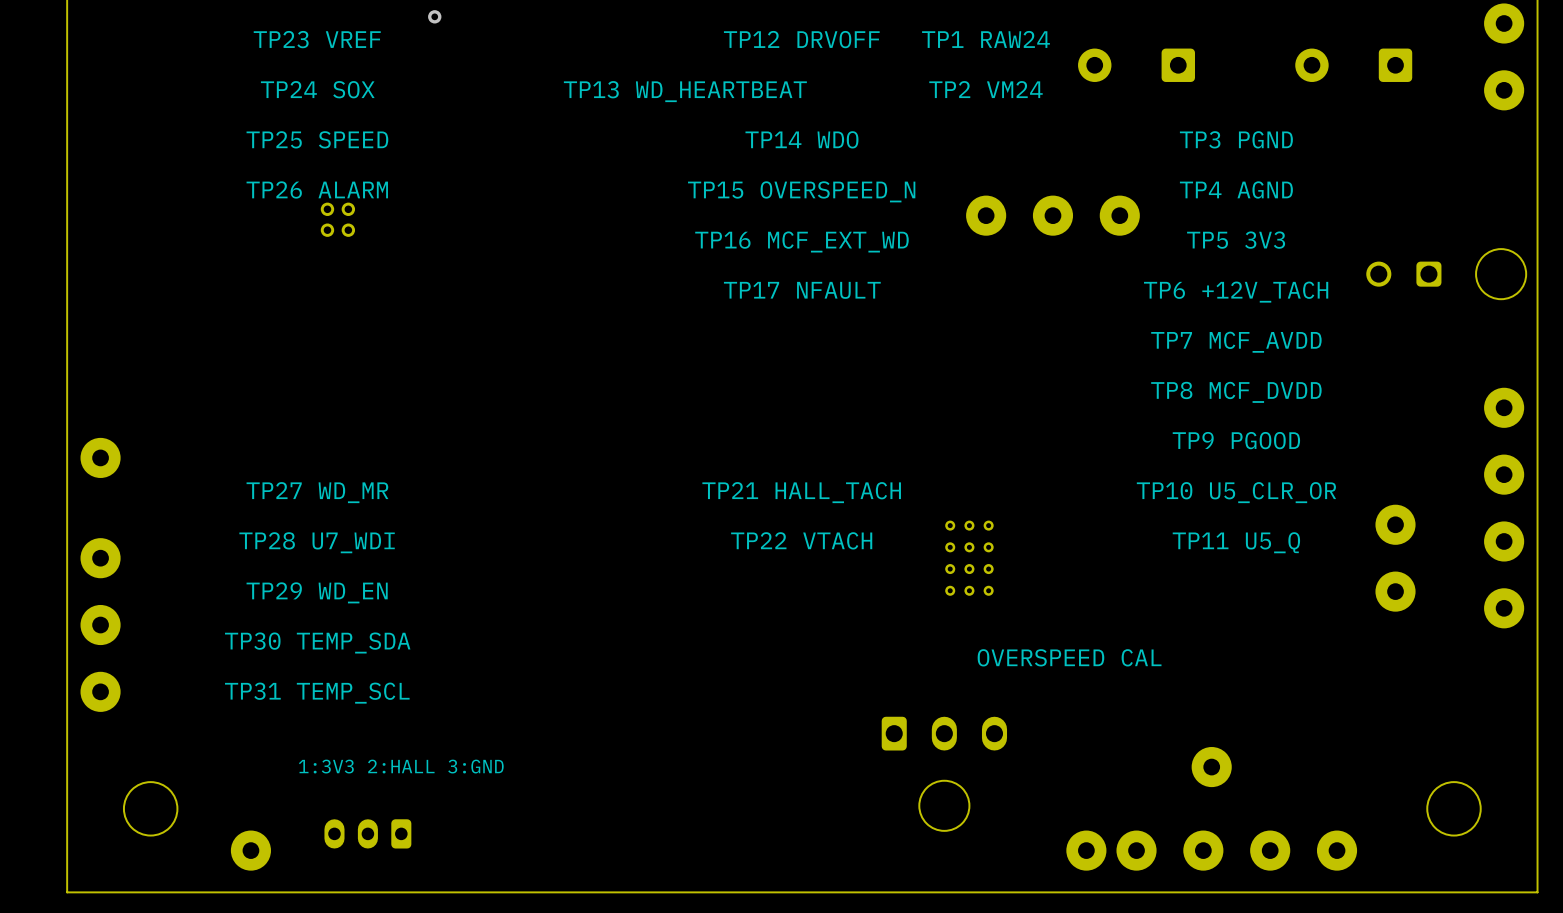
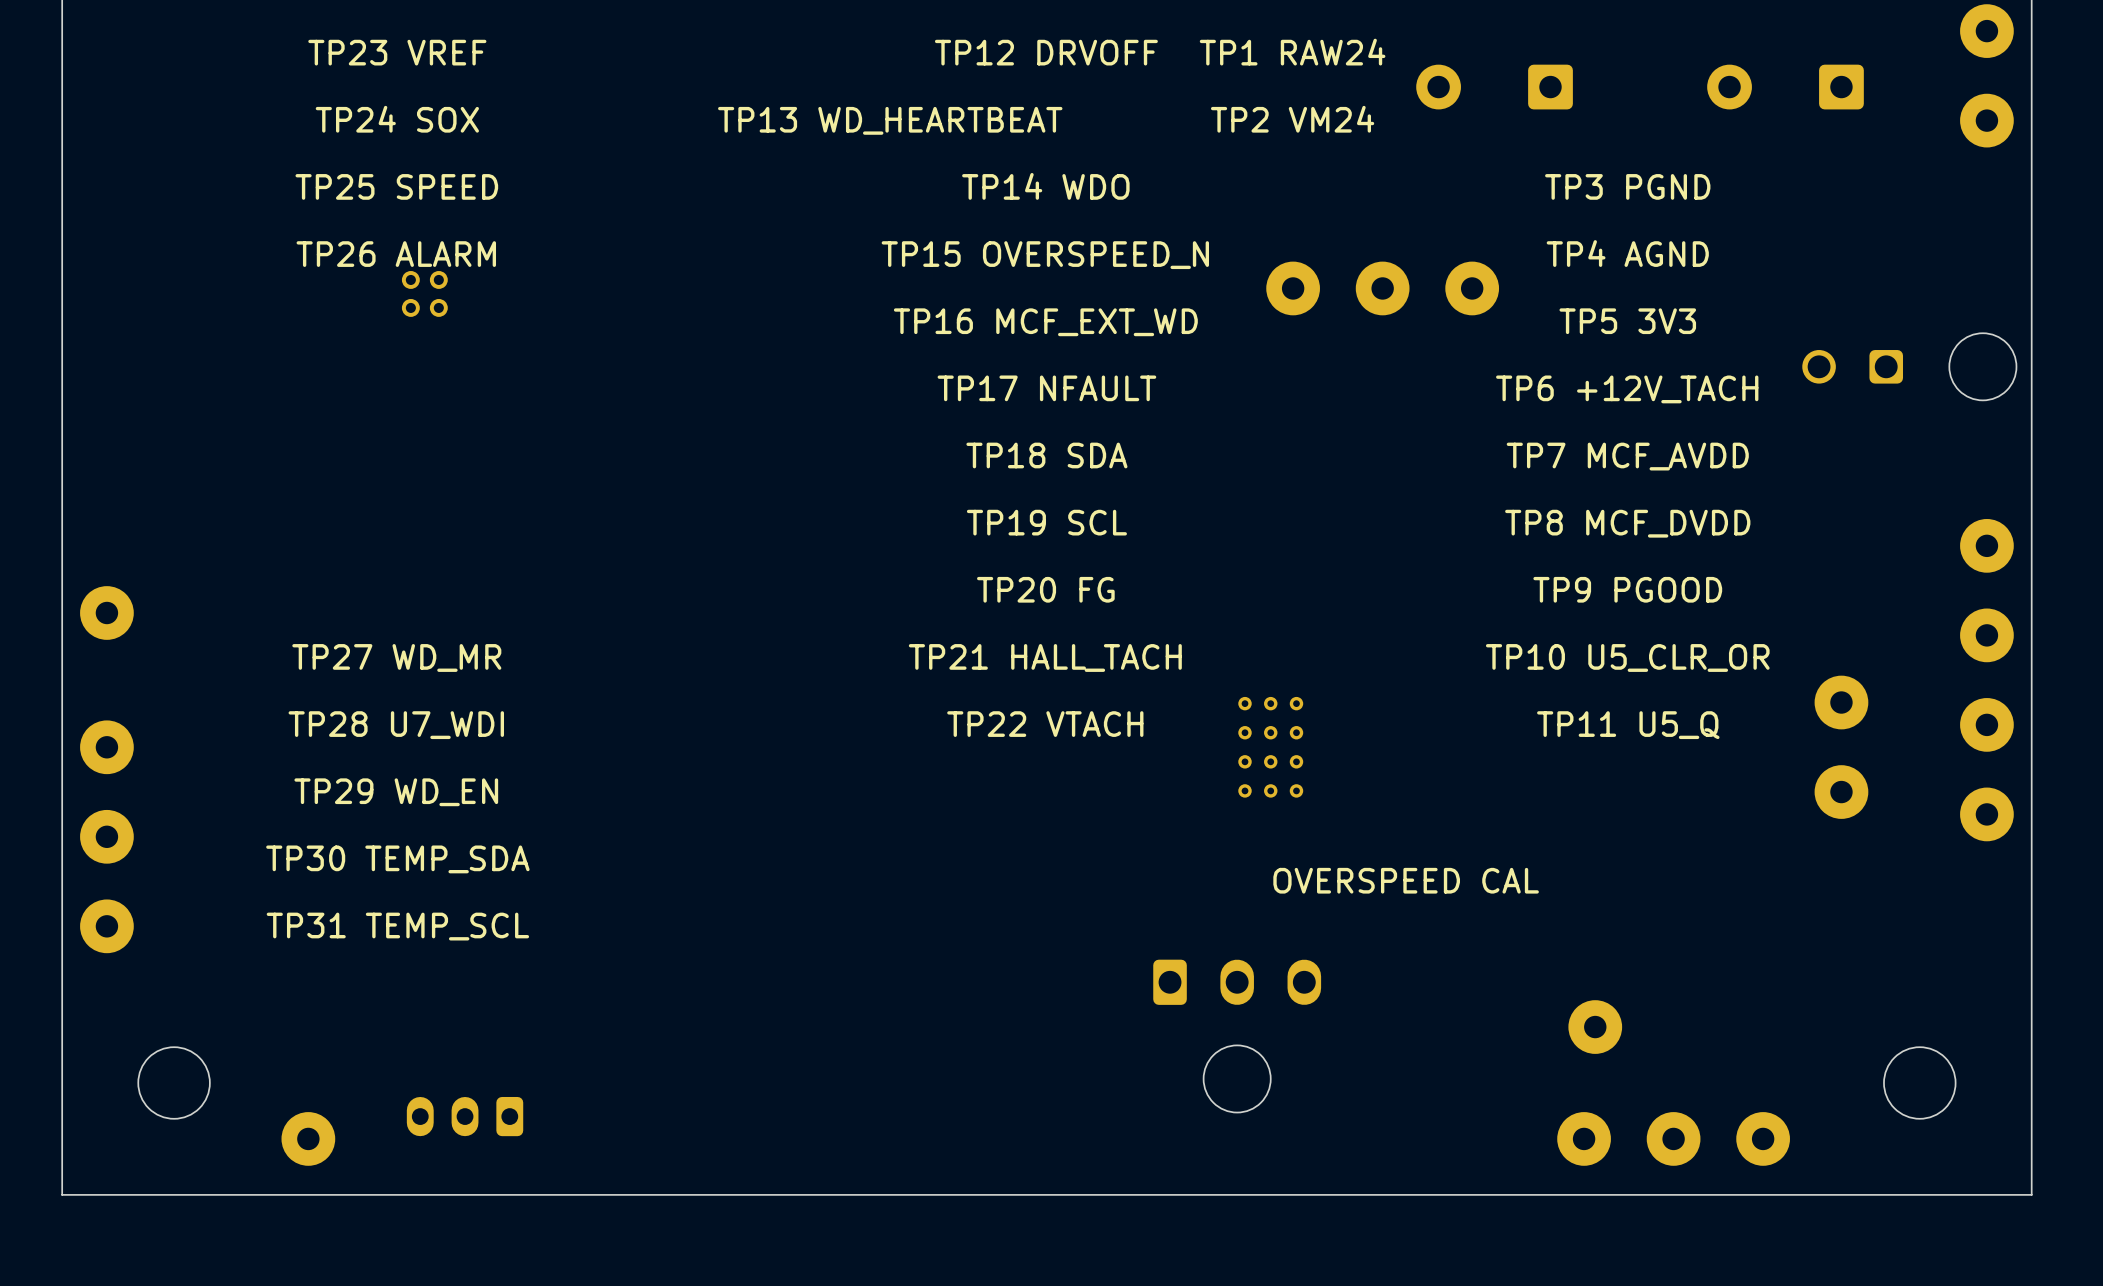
via: (434, 16) -> none
text: none -> TP18 SDA (1046, 455)
text: none -> TP19 SCL (1046, 522)
text: none -> TP20 FG (1045, 589)
text: 1:3V3 2:HALL 3:GND (401, 766) -> none
part: (1086, 850) -> none
part: (1136, 850) -> none

